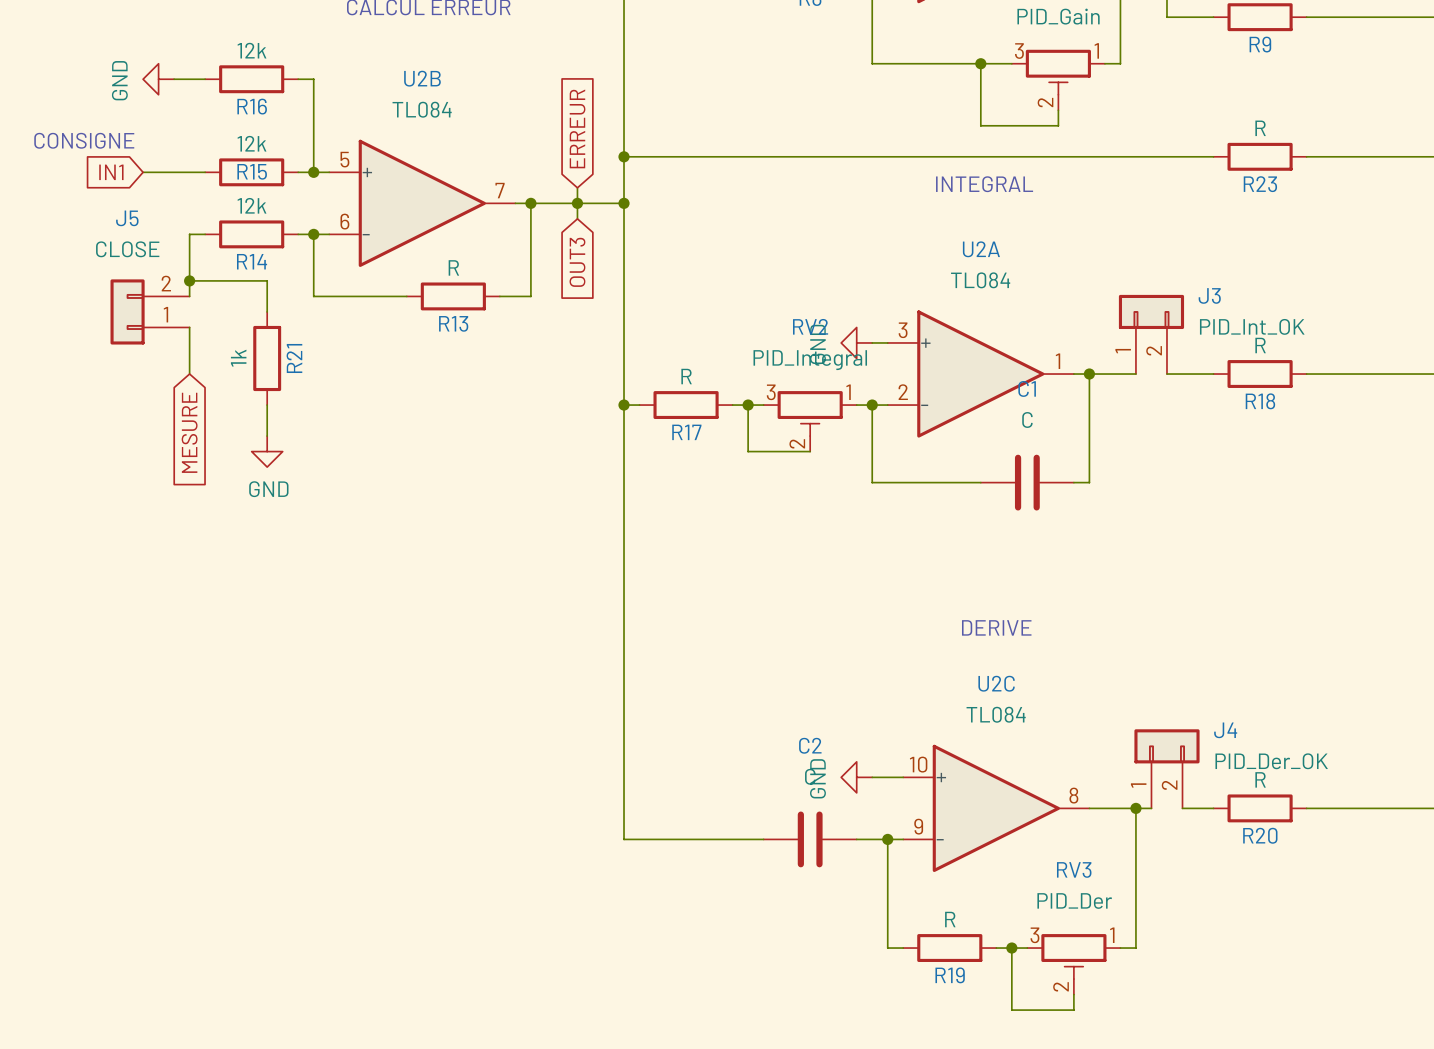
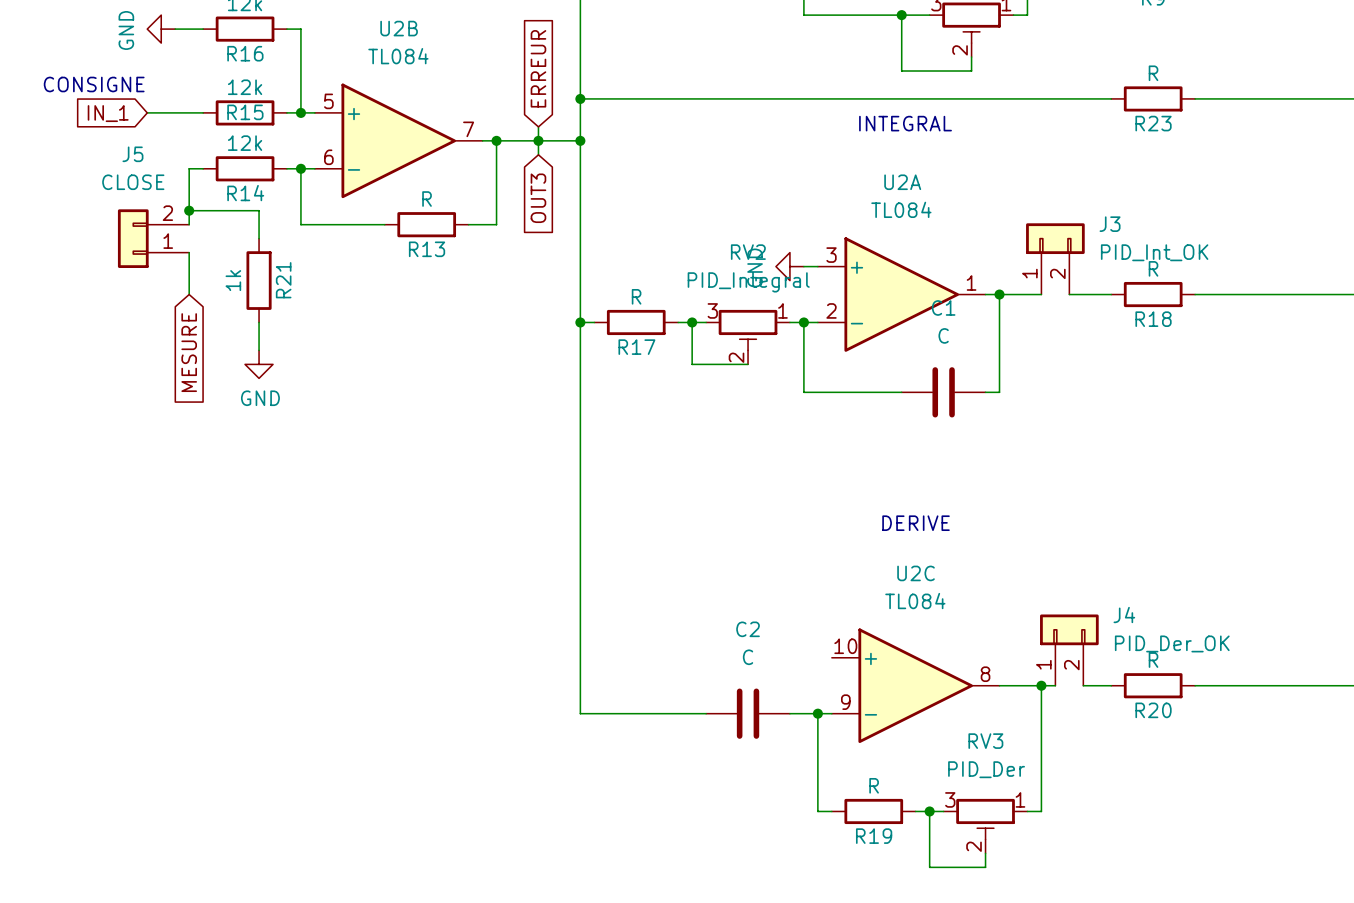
global label: IN1 (111, 172) -> IN_1 (108, 113)
power symbol: GND (856, 777) -> none
wire: (872, 777) (903, 777) -> none

